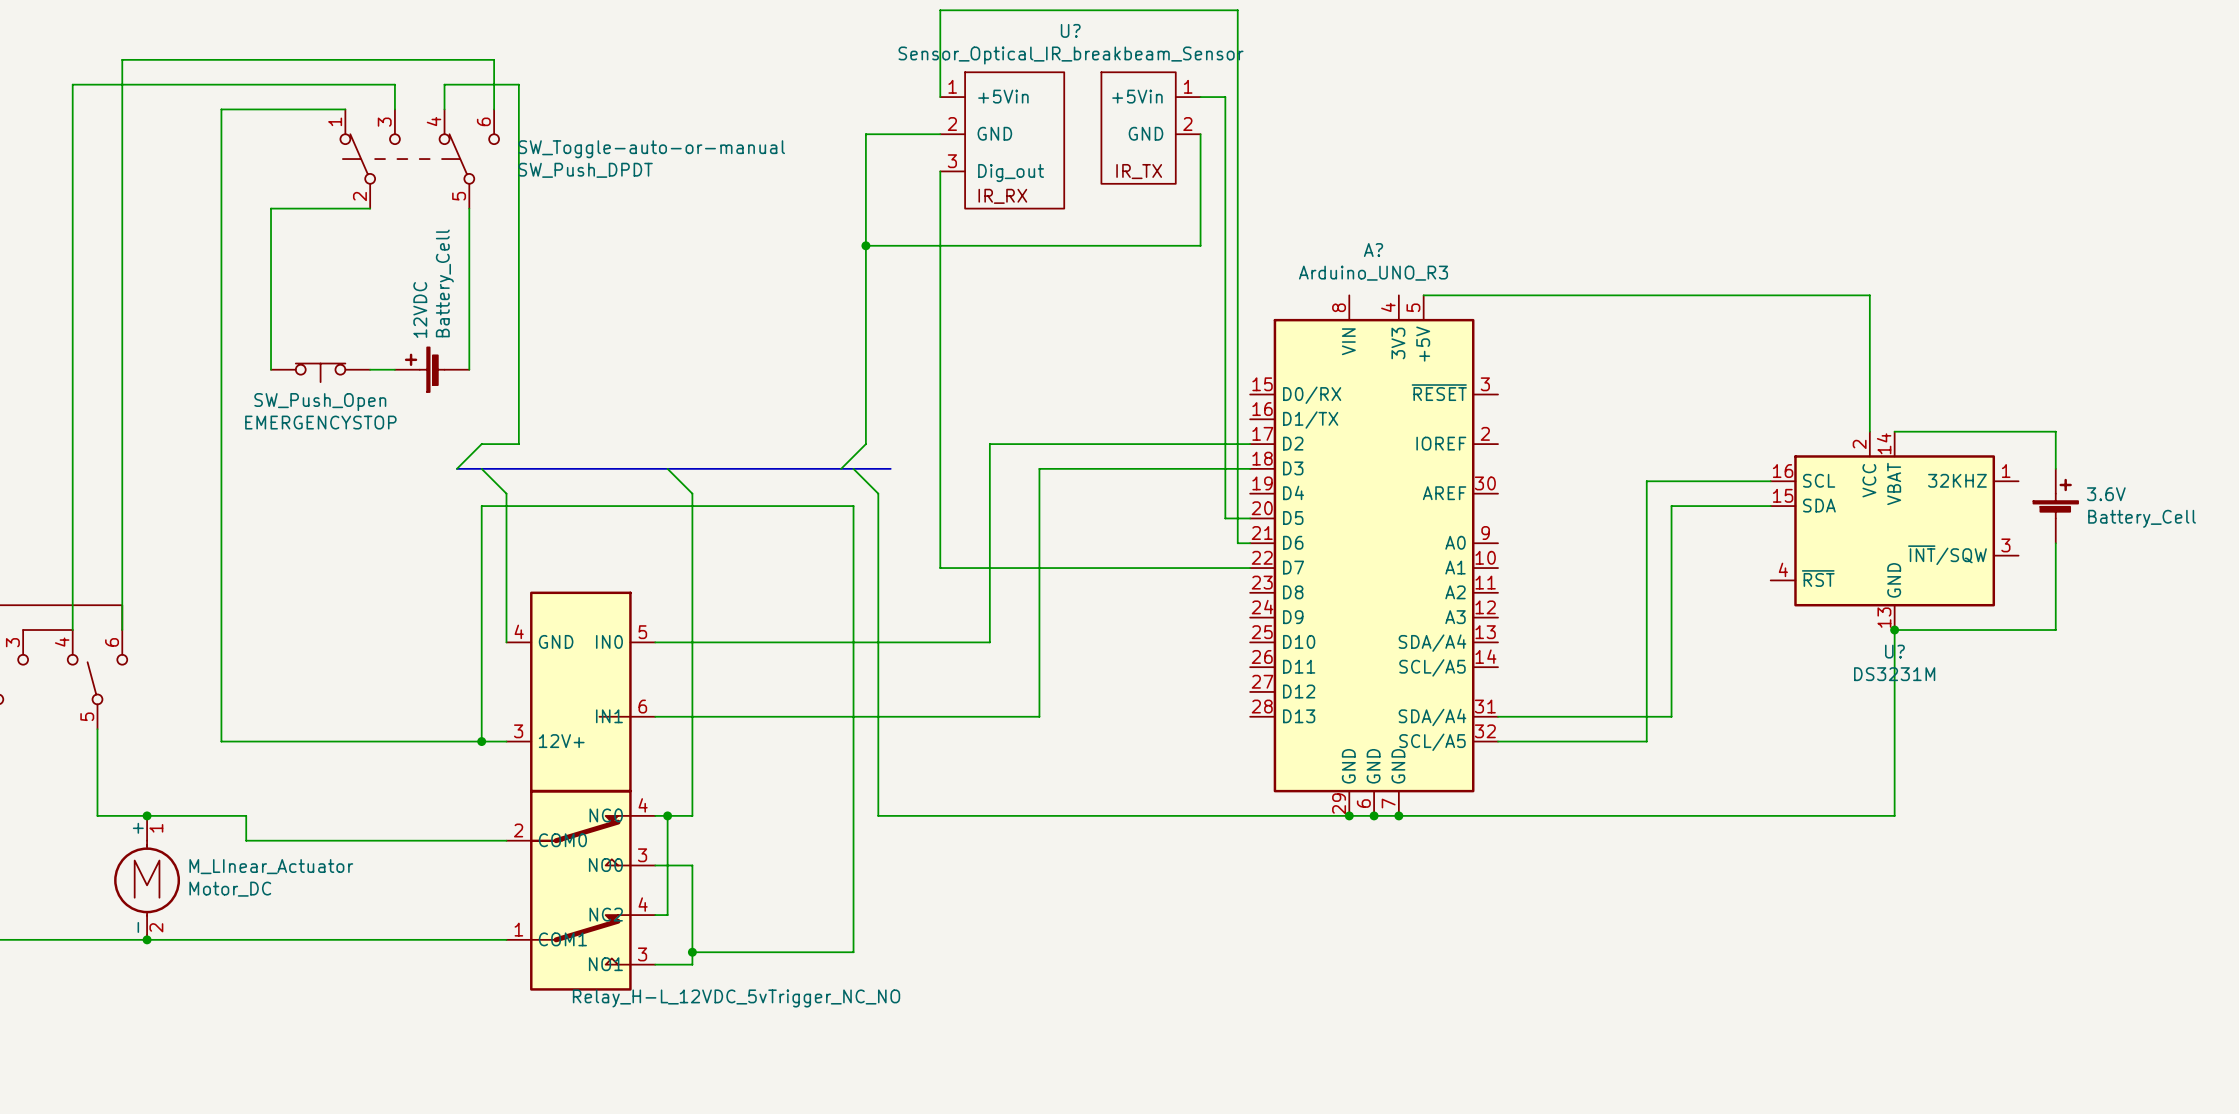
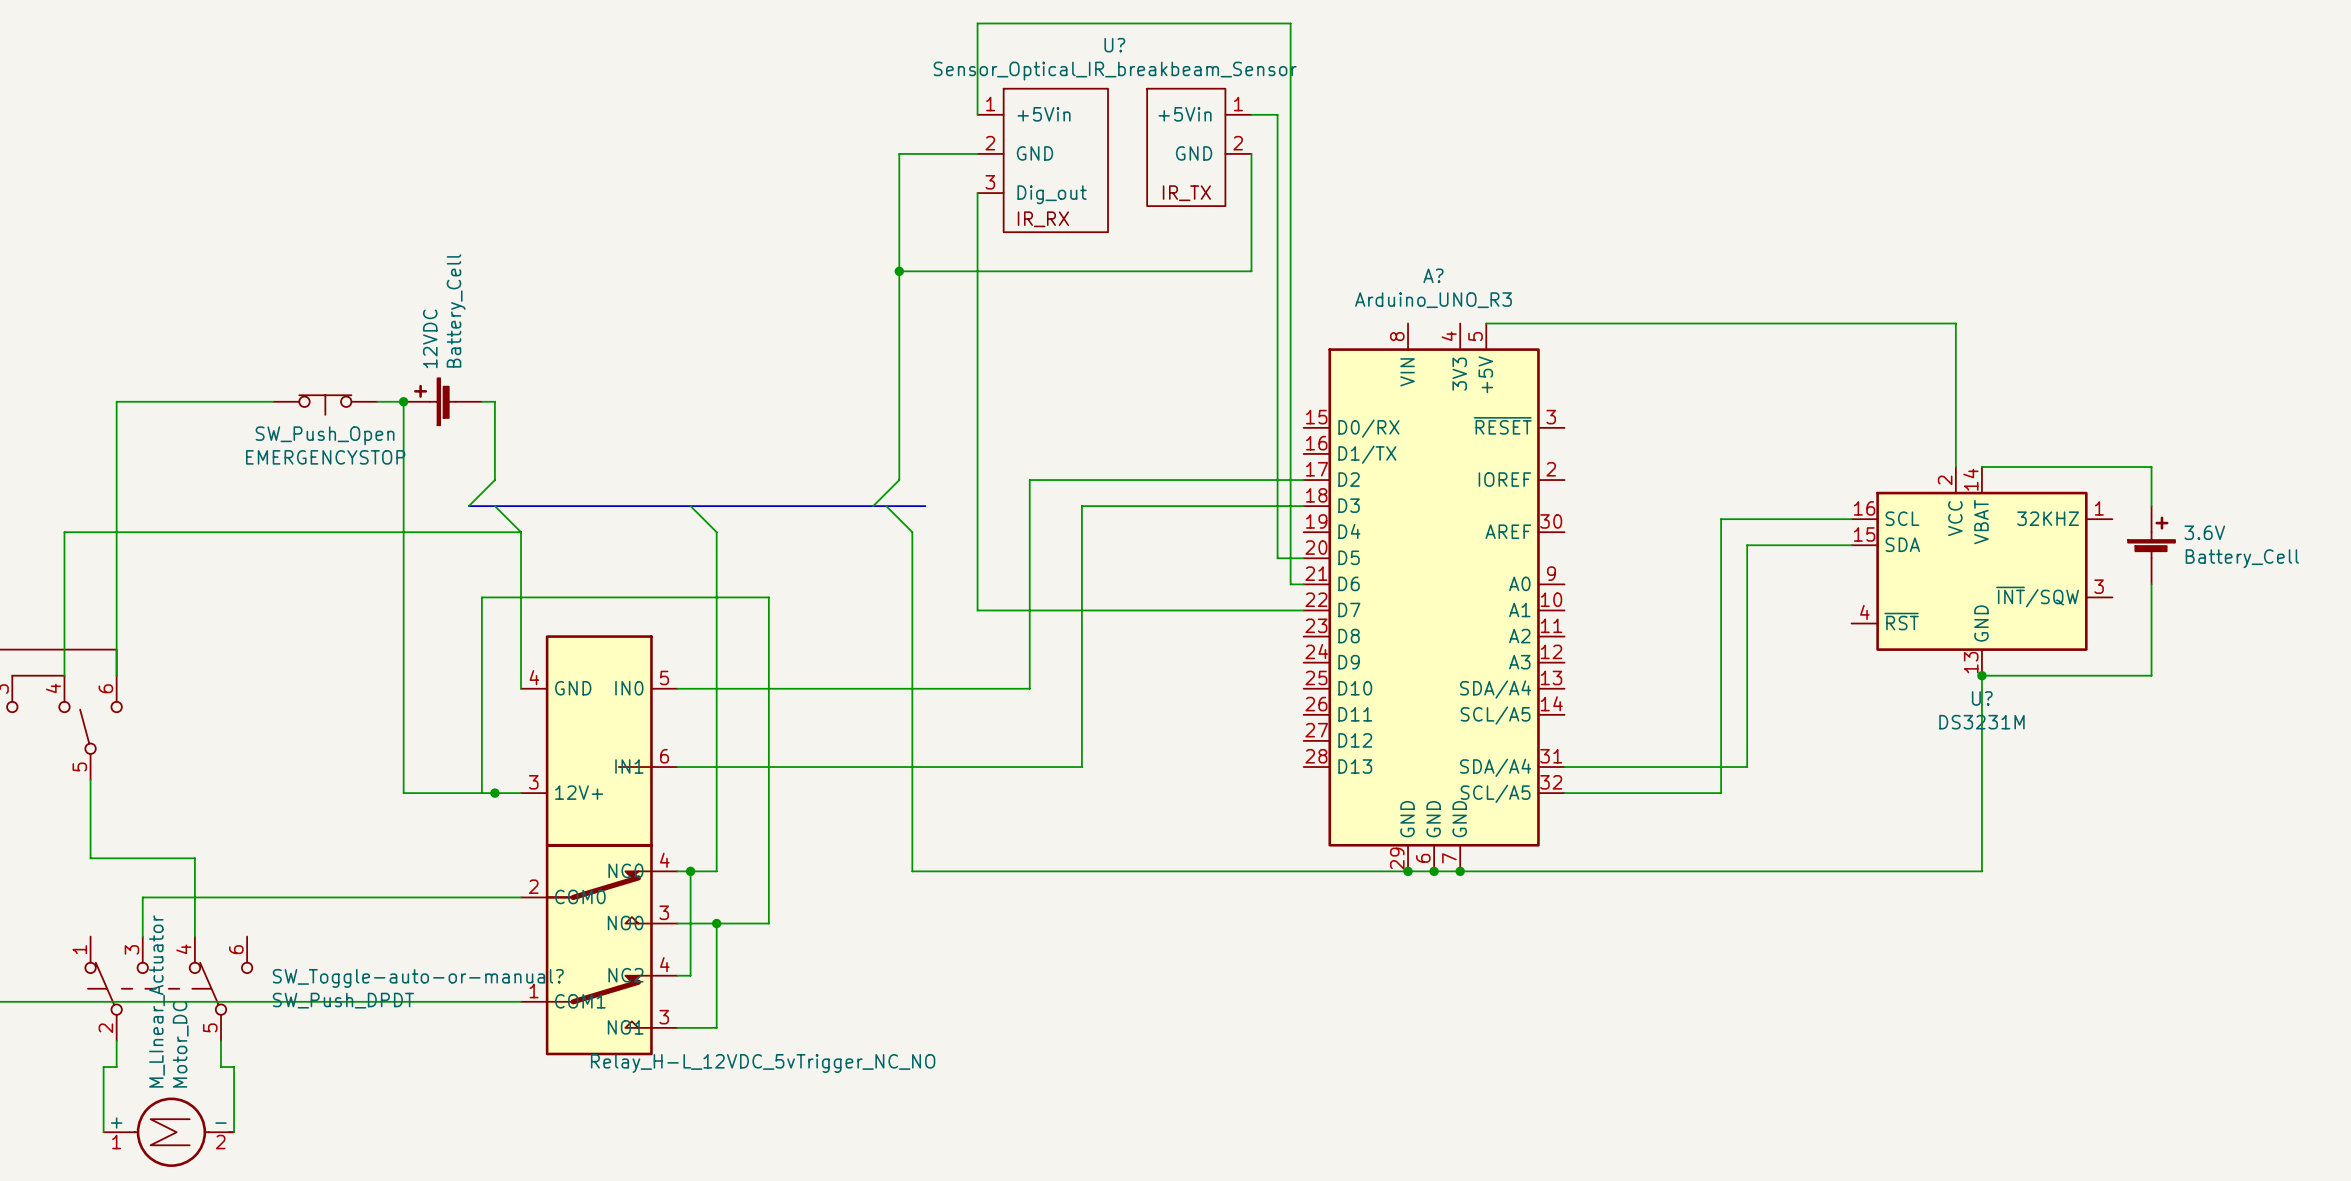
wire: (345, 109) (221, 109) (221, 741) (394, 741) -> (403, 401) (403, 793)
wire: (394, 109) (394, 84) (72, 84) (72, 493) -> (521, 532) (64, 532)
wire: (444, 109) (444, 84) (518, 84) (518, 444) (481, 444) -> none
wire: (494, 109) (494, 59) (122, 59) (122, 369) -> none
SW_Toggle-auto-or-manual: SW_Push_DPDT (419, 159) -> none
wire: (370, 208) (271, 208) (271, 369) -> (116, 401) (273, 401)
wire: (469, 208) (469, 369) -> (494, 480) (494, 401) (481, 401)
junction: none -> (403, 401)
wire: none -> (481, 793) (481, 597) (768, 597) (768, 923) (716, 923)
wire: (481, 741) (481, 506) (853, 506) (853, 952) (692, 952) -> none
wire: (97, 803) (97, 815) (246, 815) (246, 840) -> (90, 858) (194, 858) (194, 936)
junction: (147, 815) -> none
wire: none -> (247, 897) (142, 897) (142, 936)
junction: none -> (716, 923)
M_LInear_Actuator position: (147, 877) -> (168, 1132)
M_LInear_Actuator rotation: 0° (147, 890) -> 90° counterclockwise (181, 1132)
SW_Toggle-auto-or-manual?: none -> SW_Push_DPDT (168, 988)
junction: (147, 939) -> none
junction: (692, 952) -> none
wire: none -> (116, 1040) (116, 1067) (103, 1067) (103, 1132)
wire: none -> (221, 1040) (221, 1067) (234, 1067) (234, 1132)

